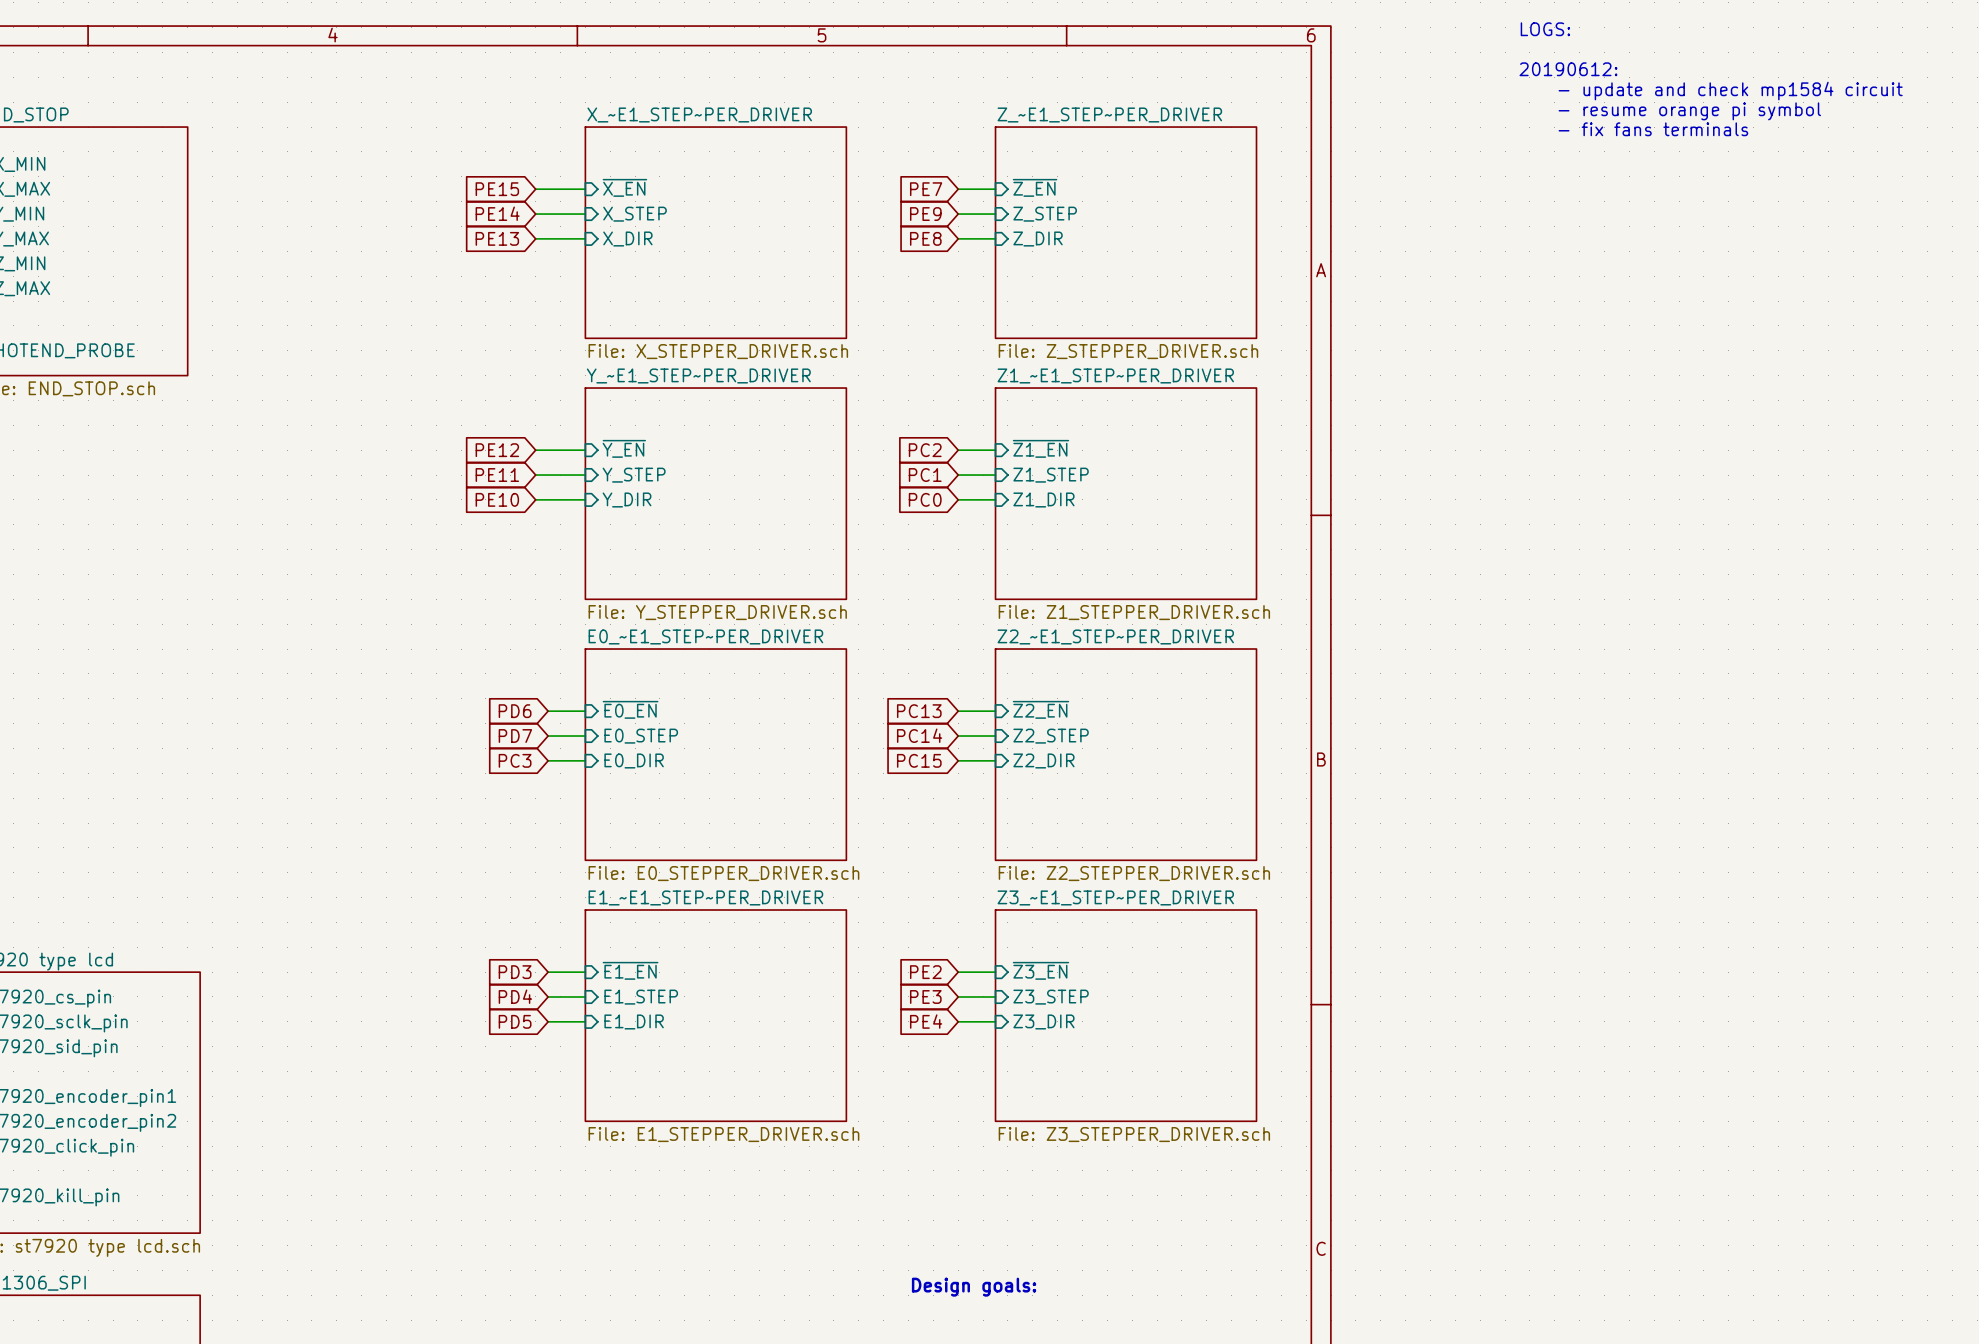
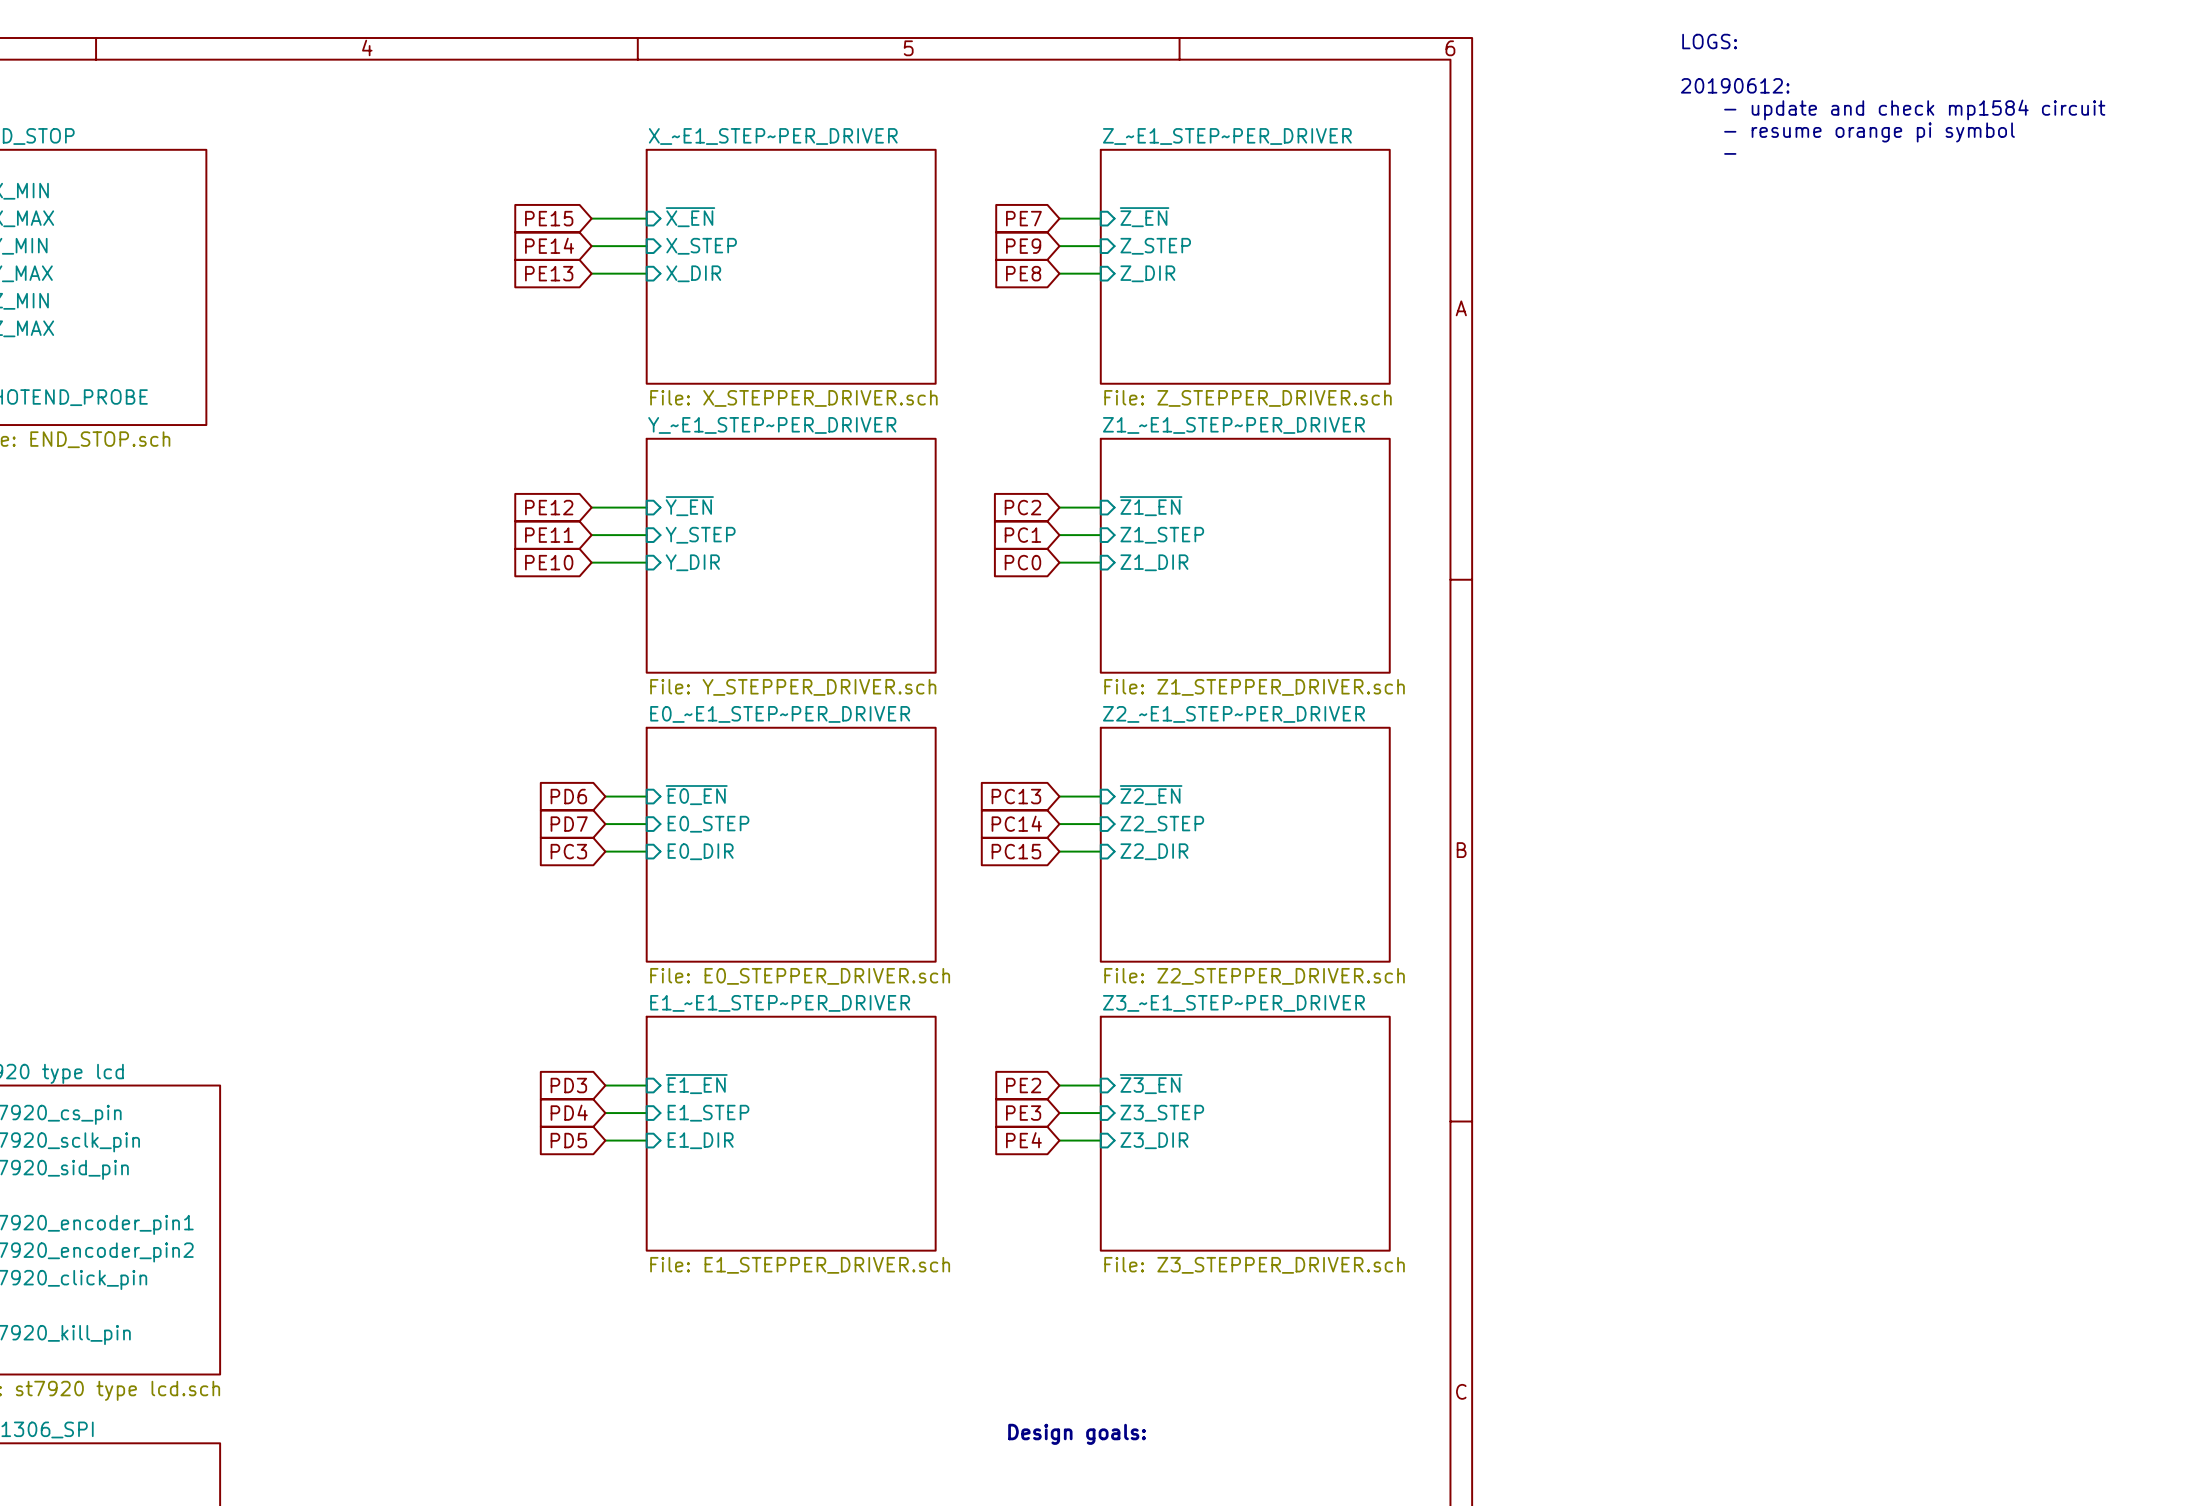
text: - fix fans terminals (1653, 129) -> - (1730, 153)

